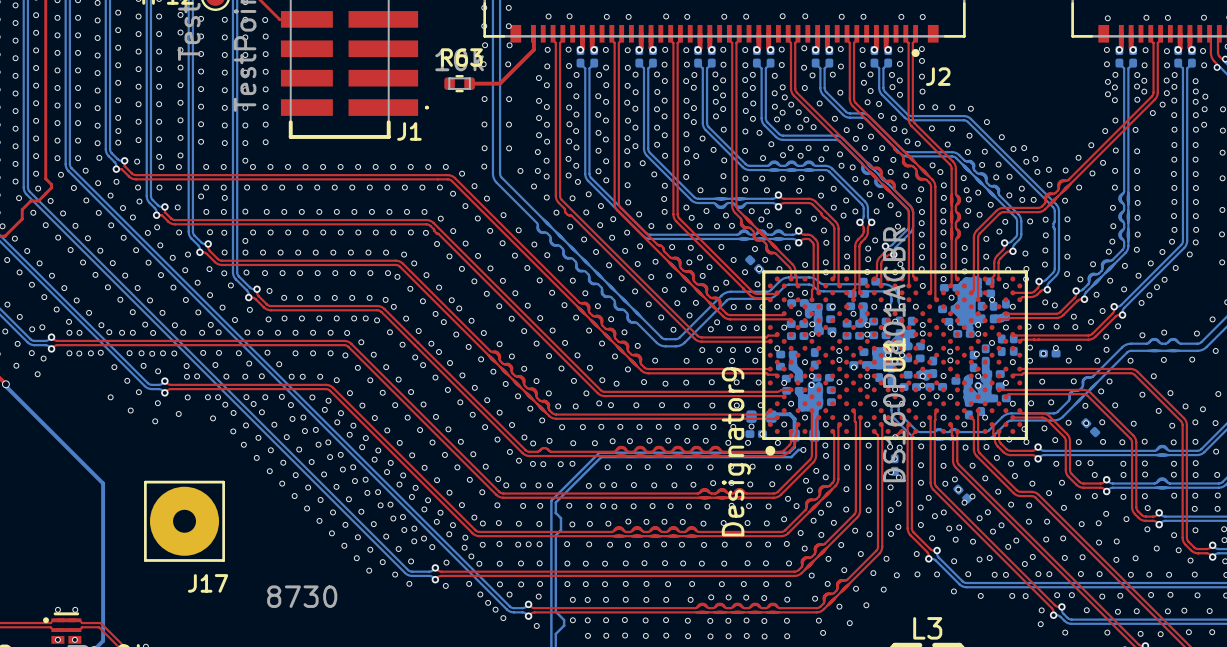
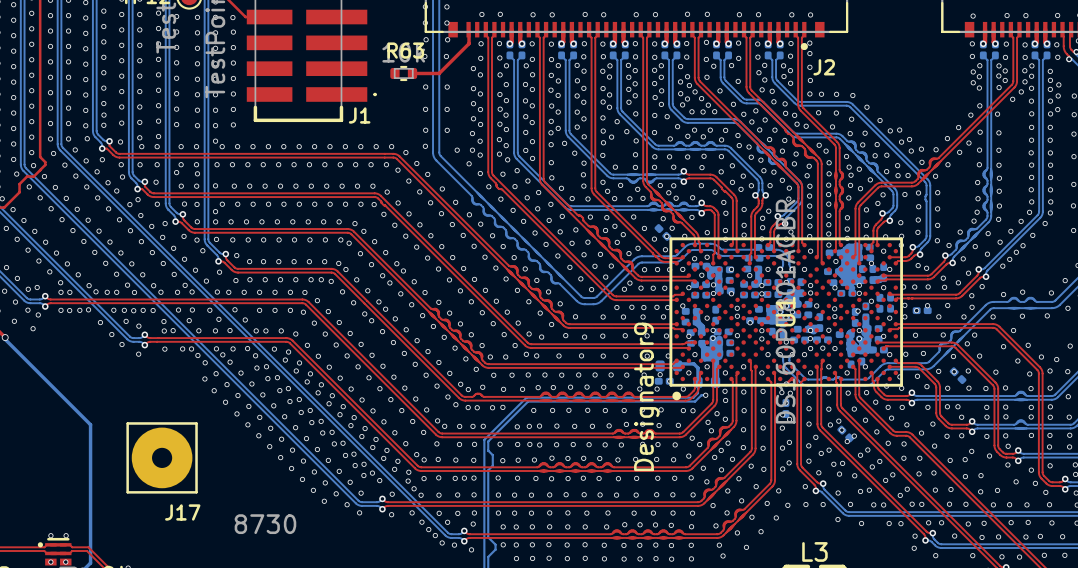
via: (110, 397) -> none
via: (130, 410) -> none
via: (178, 413) -> none
via: (213, 418) -> none
via: (155, 421) -> none
via: none -> (454, 545)

